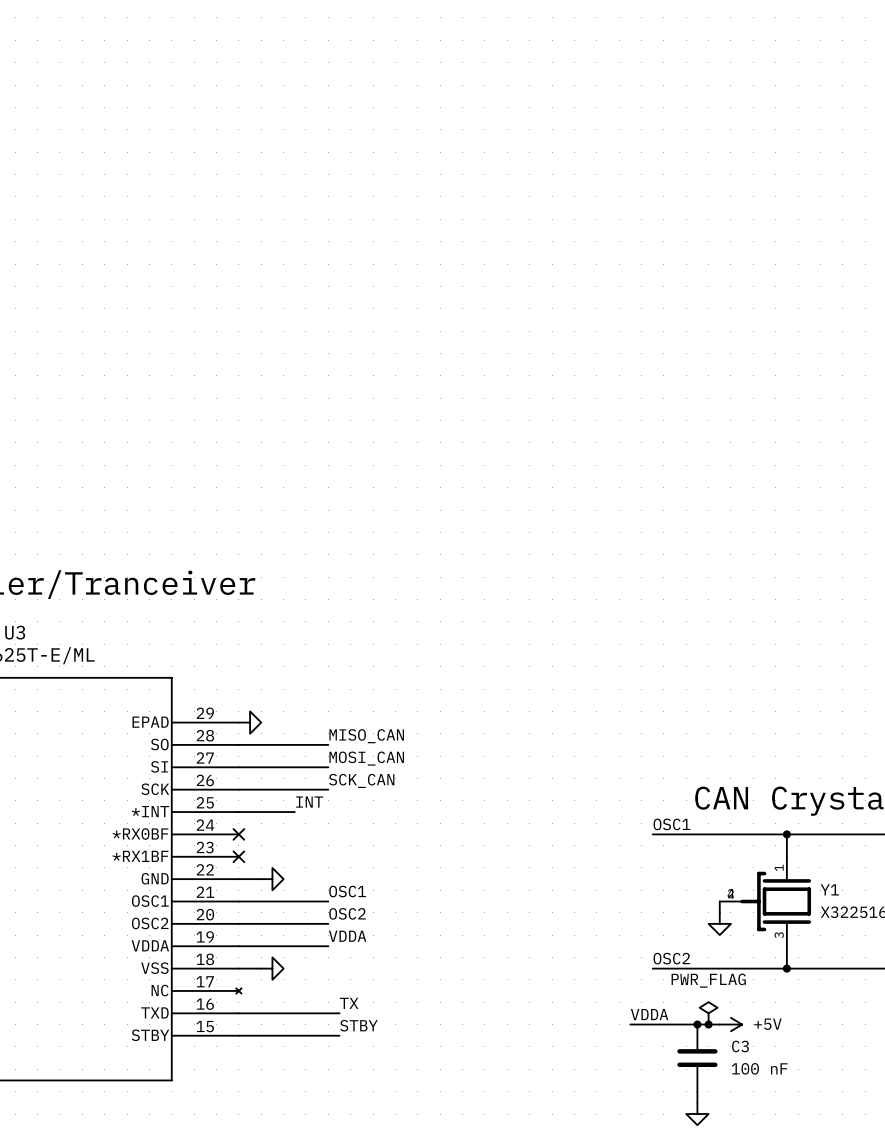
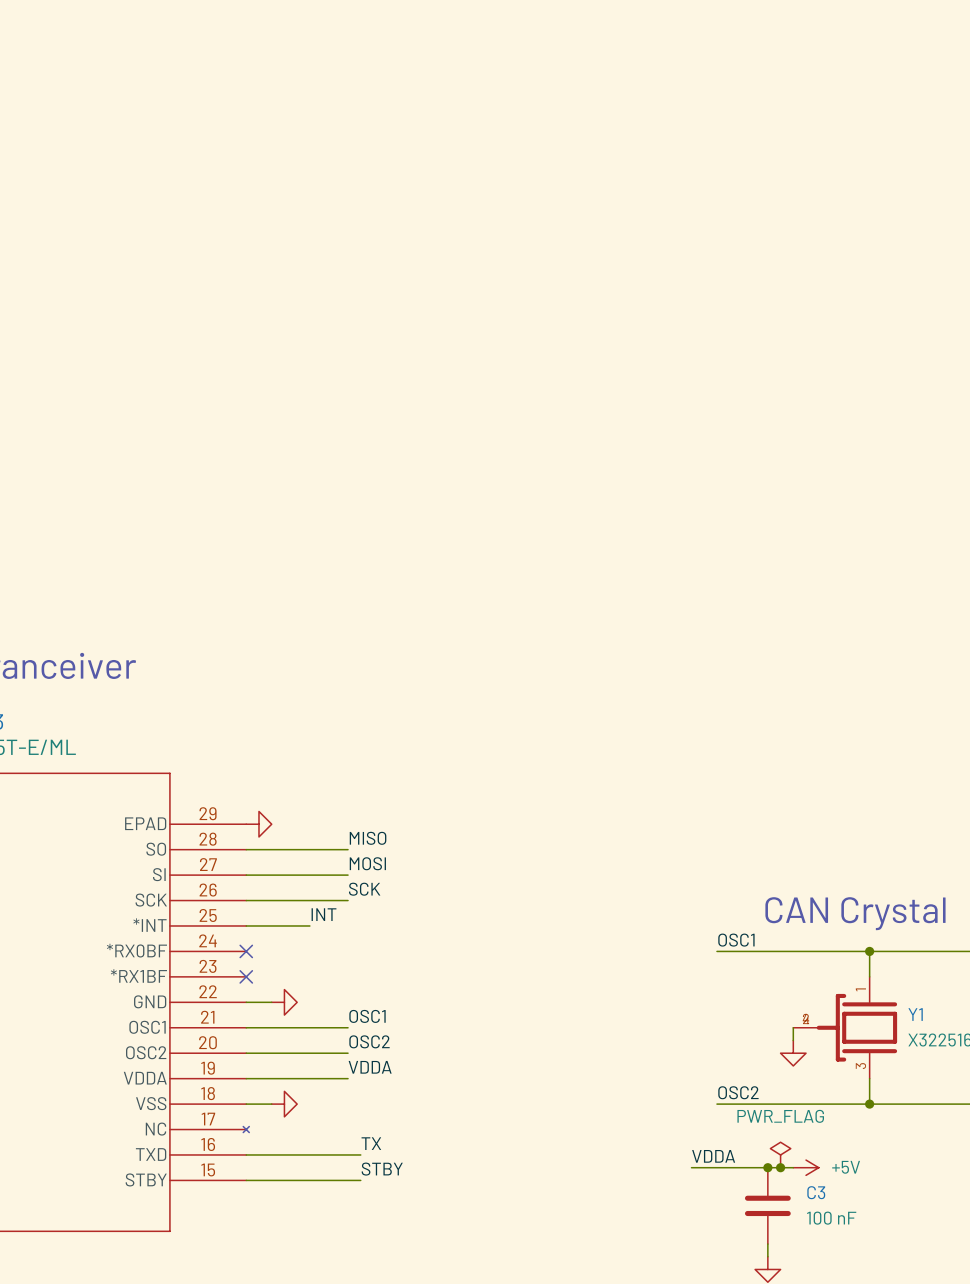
label: MISO_CAN (366, 736) -> MISO (368, 838)
label: MOSI_CAN (366, 758) -> MOSI (367, 863)
label: SCK_CAN (361, 780) -> SCK (364, 889)

